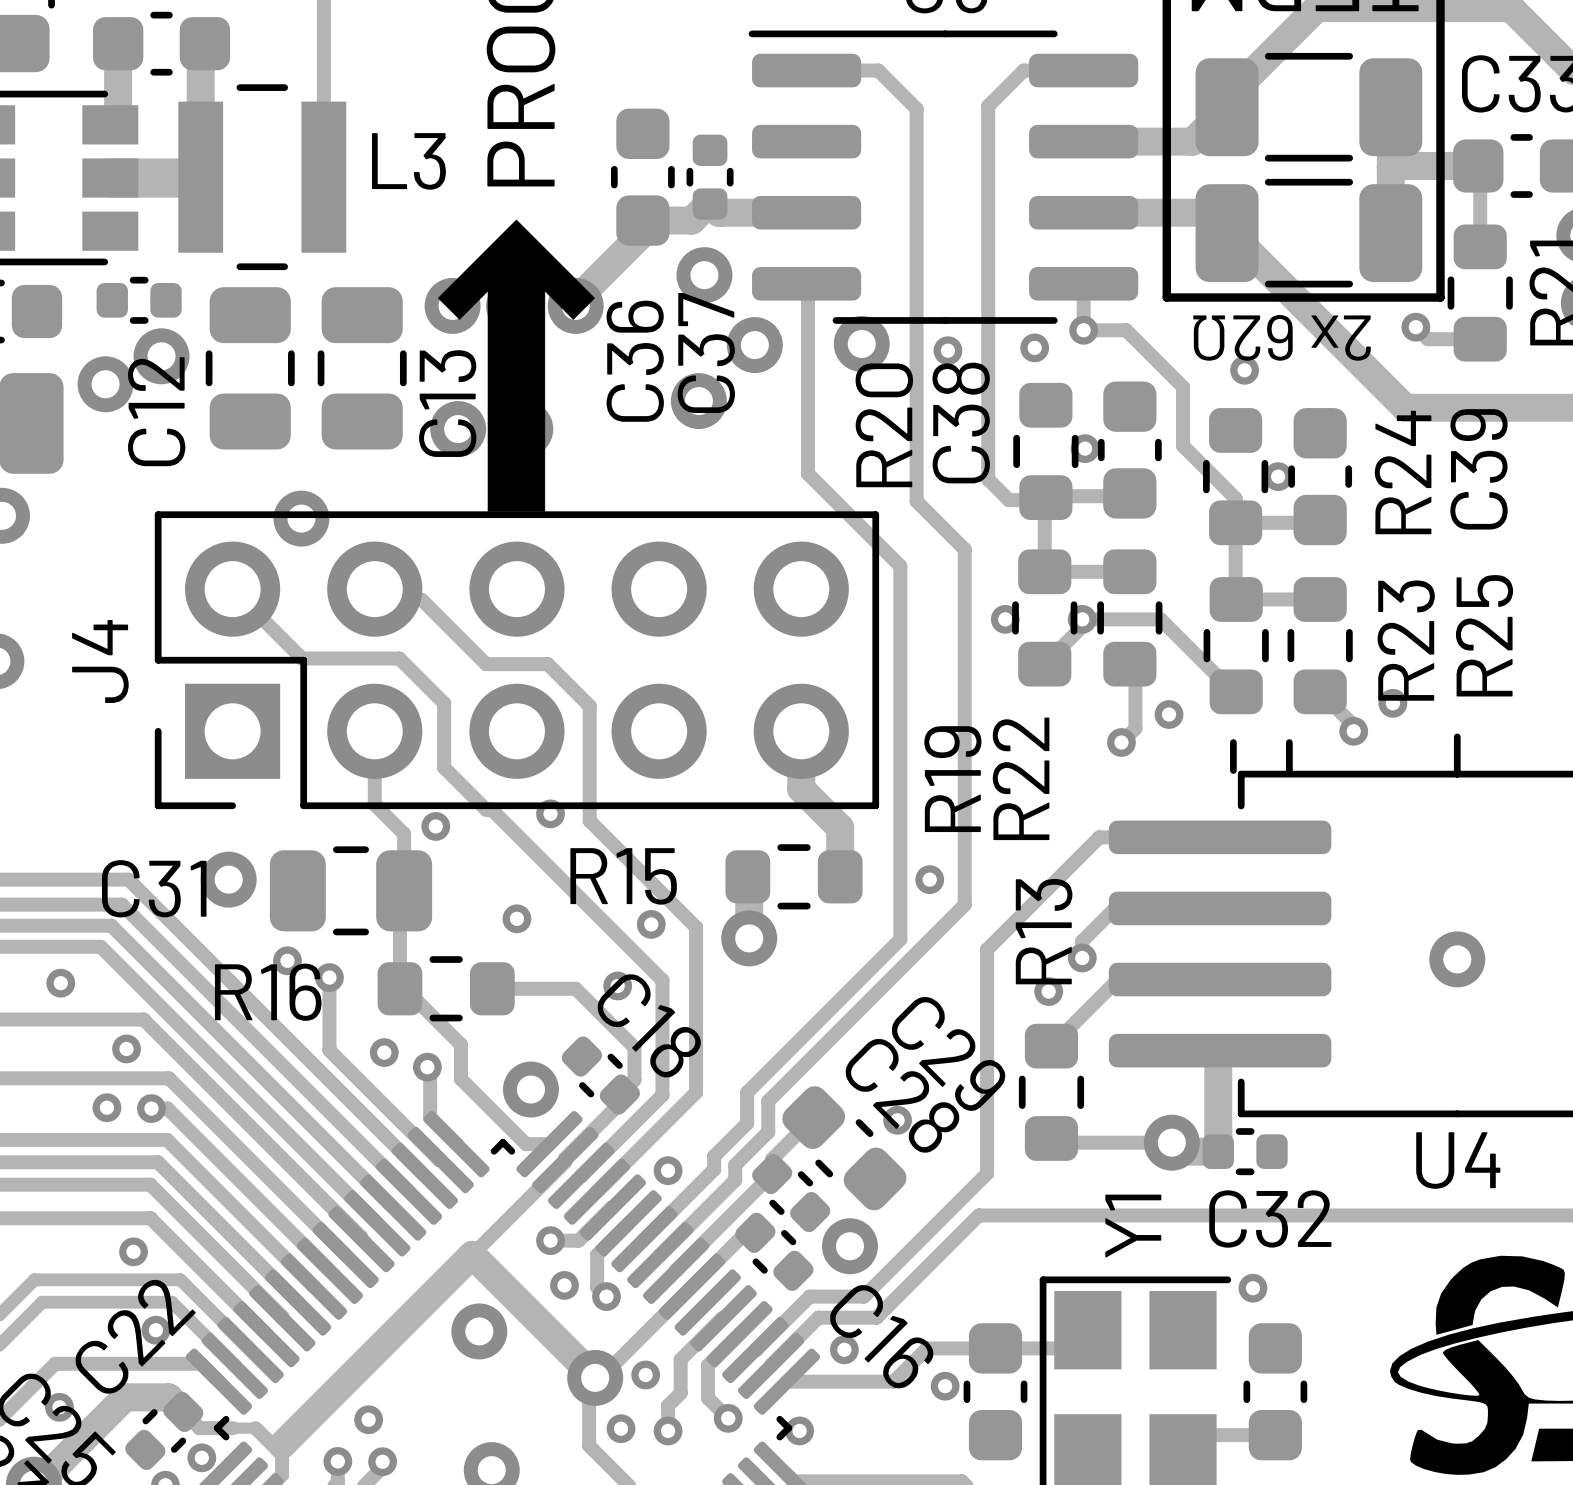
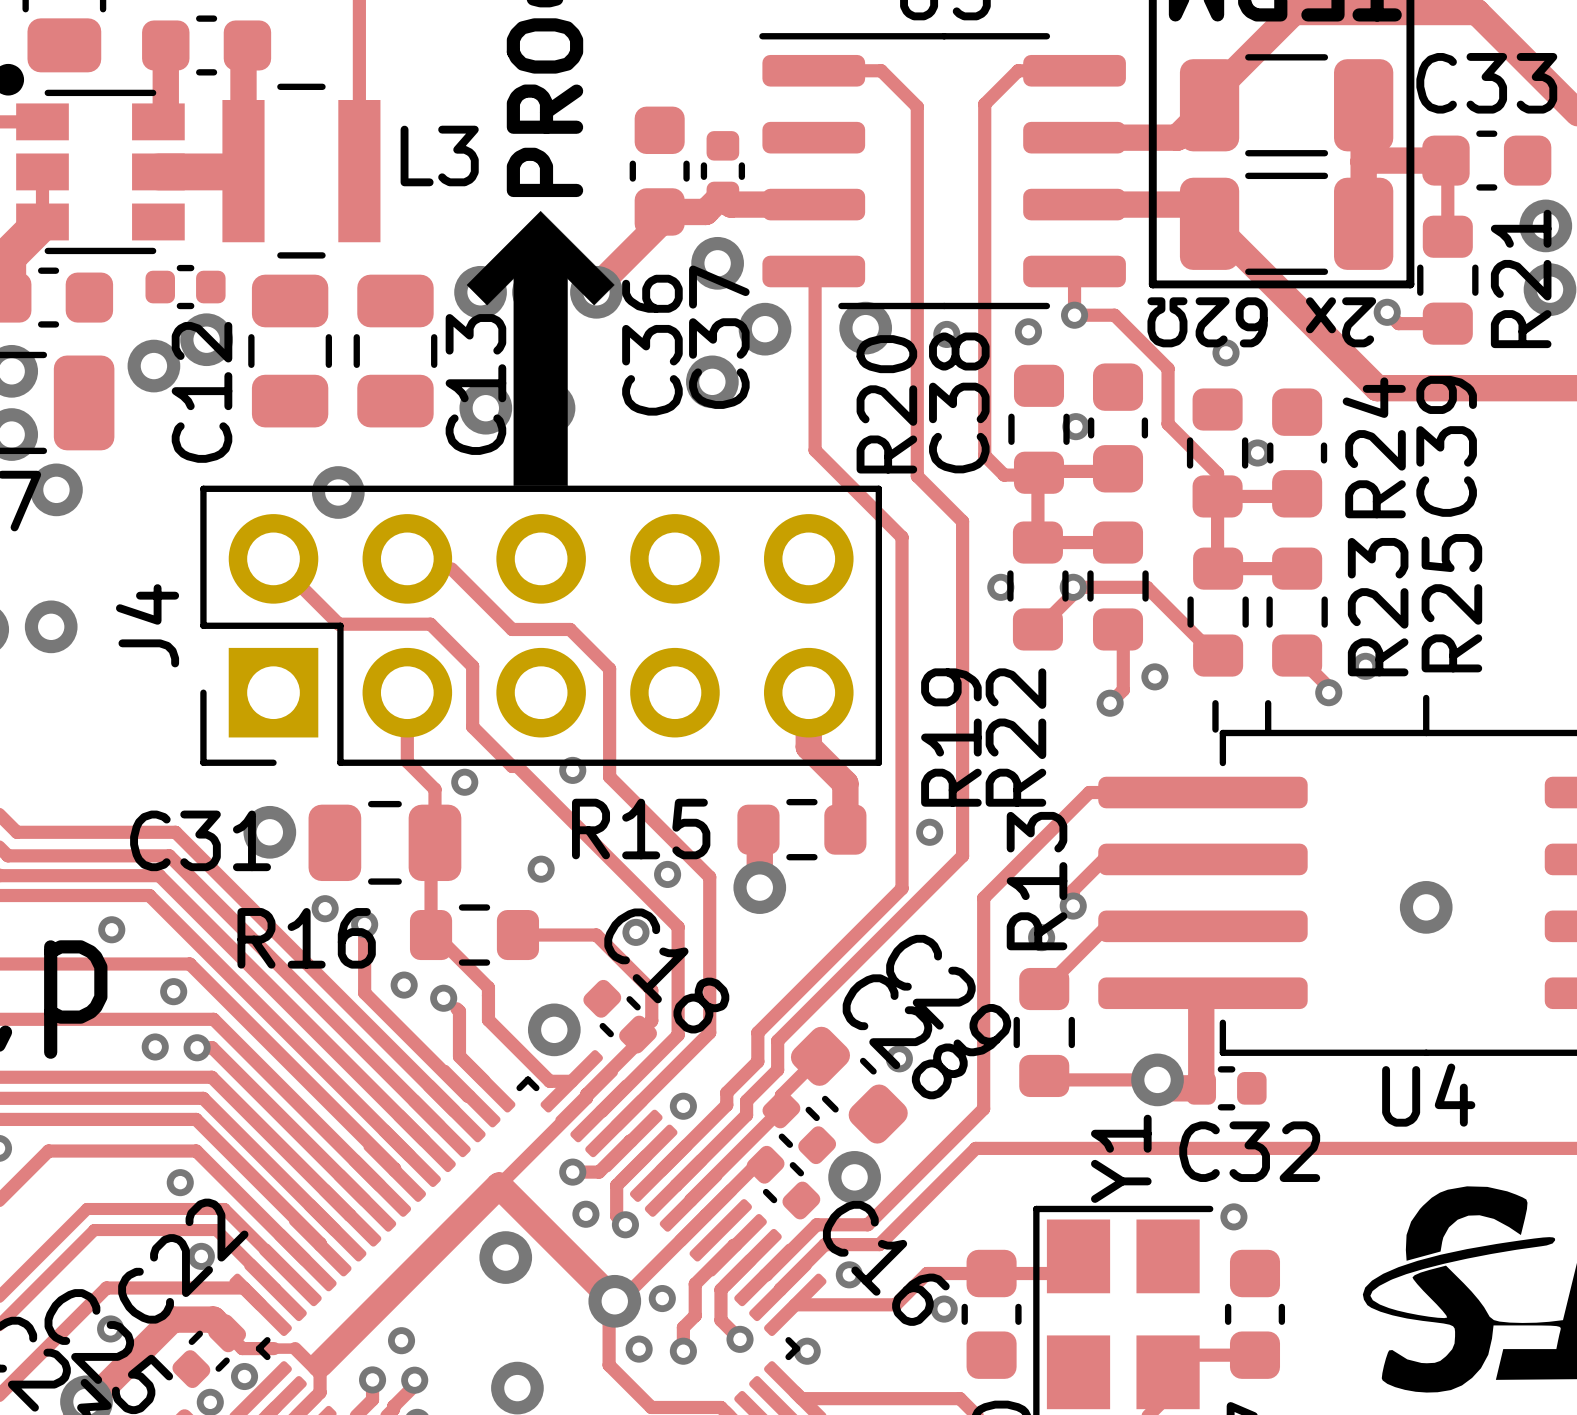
via position: (384, 1052) -> (404, 985)
via position: (427, 1067) -> (443, 998)

